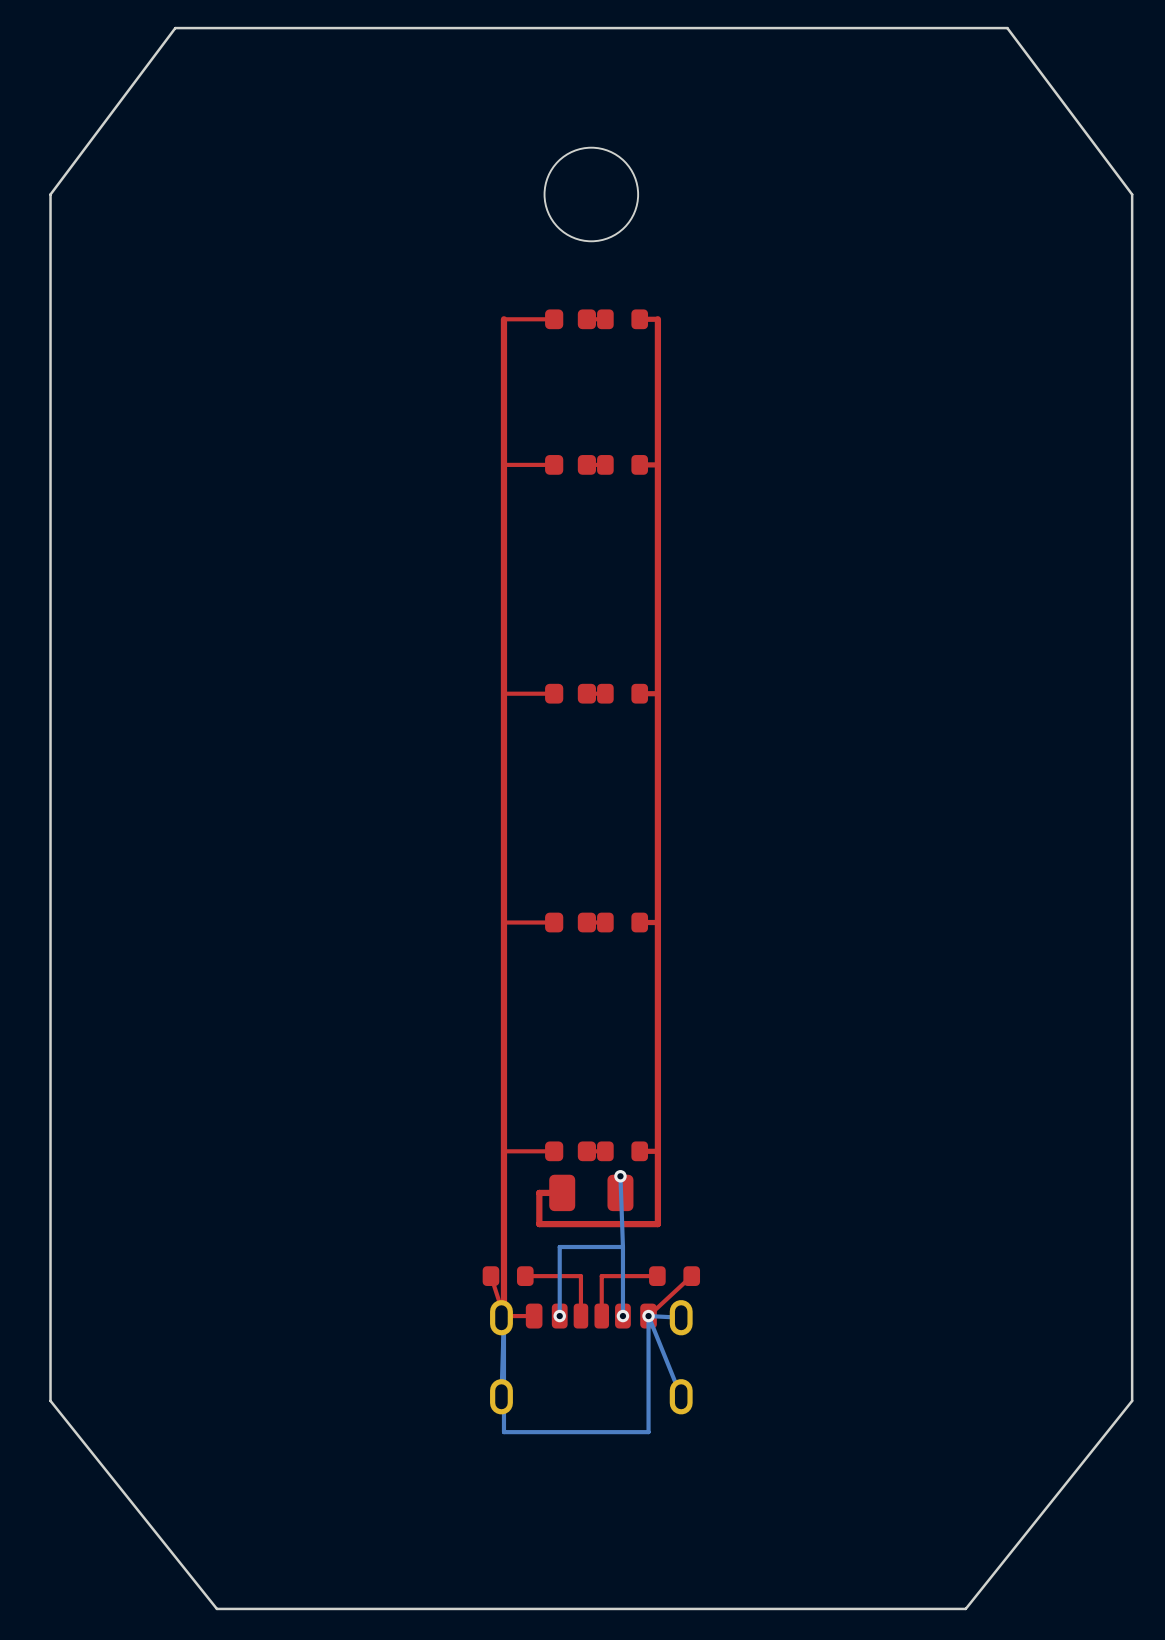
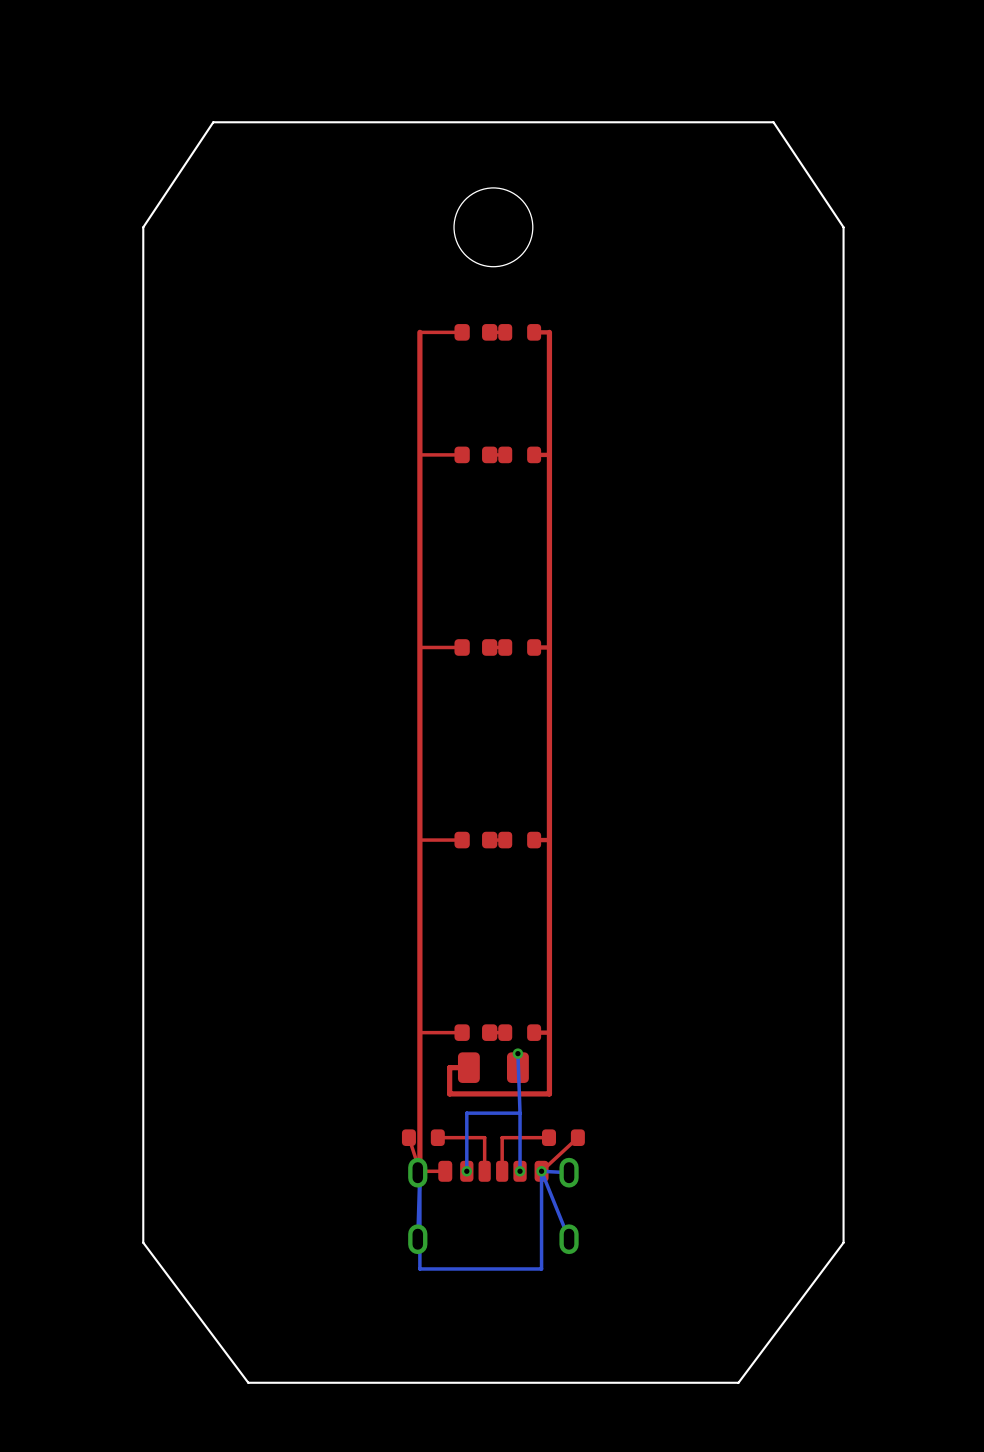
board edge: (1007, 28) (1132, 194) (1132, 1400) (965, 1608) (216, 1608) (50, 1400) (50, 194) (175, 28) (1007, 28) -> (773, 122) (843, 227) (843, 1242) (738, 1382) (248, 1382) (143, 1242) (143, 227) (213, 122) (773, 122)

